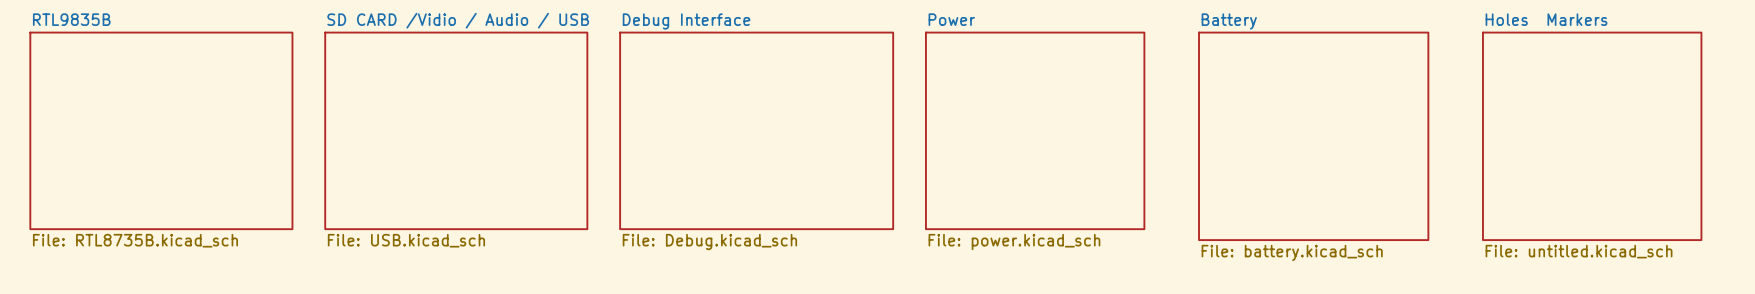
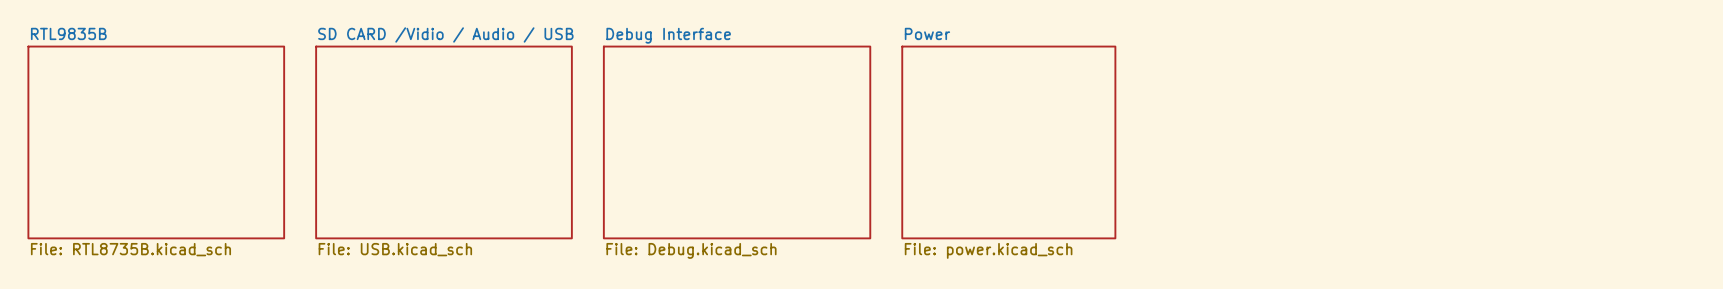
sheet Battery: File: battery.kicad_sch (1313, 136) -> none
sheet Holes Markers: File: untitled.kicad_sch (1592, 136) -> none

